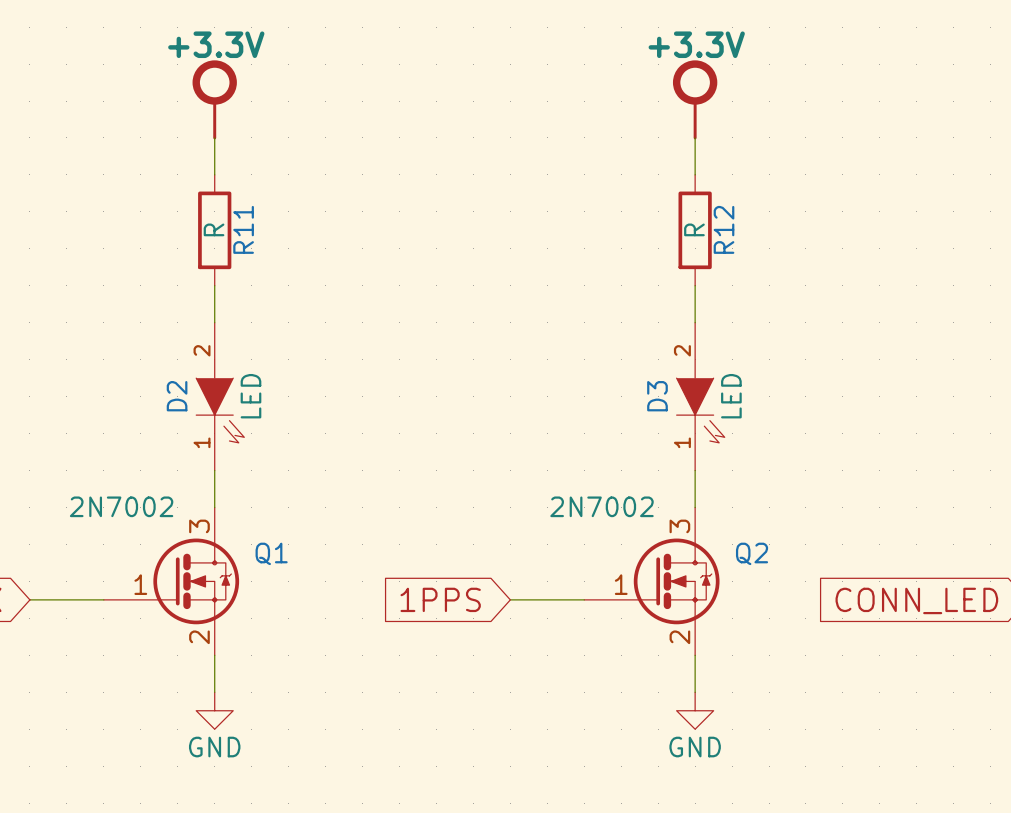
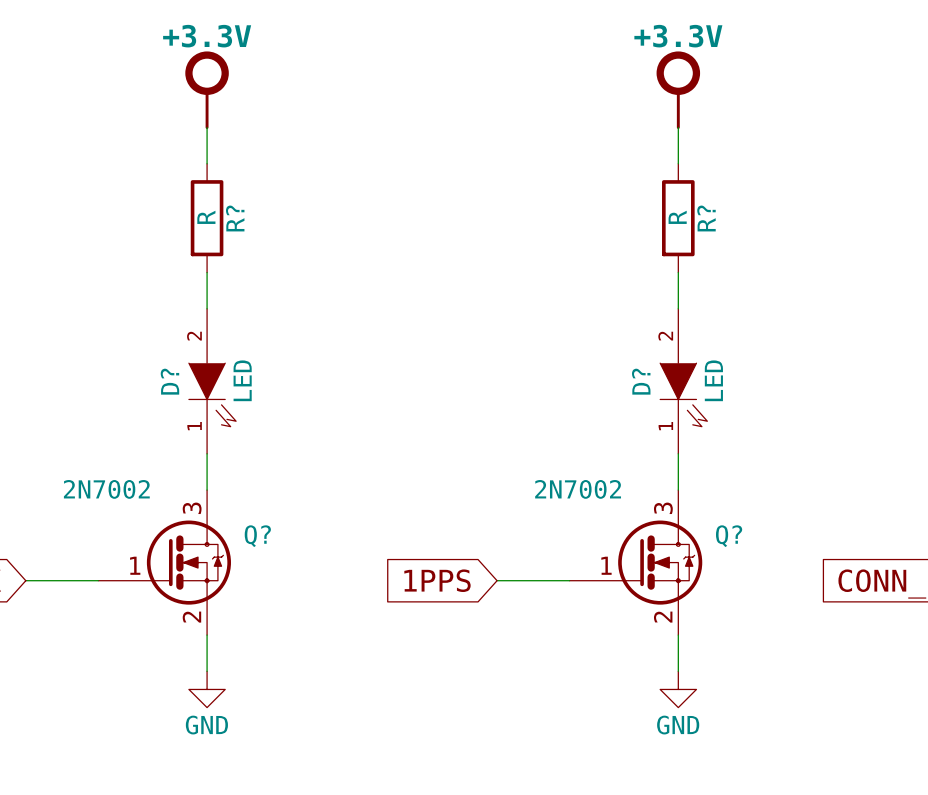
R11 name: R11 (243, 229) -> R? (235, 218)
R12 name: R12 (724, 229) -> R? (706, 218)
D2 name: D2 (177, 396) -> D? (169, 381)
D3 name: D3 (657, 396) -> D? (641, 381)
Q1 name: Q1 (271, 553) -> Q? (257, 536)
Q2 name: Q2 (752, 553) -> Q? (729, 536)

